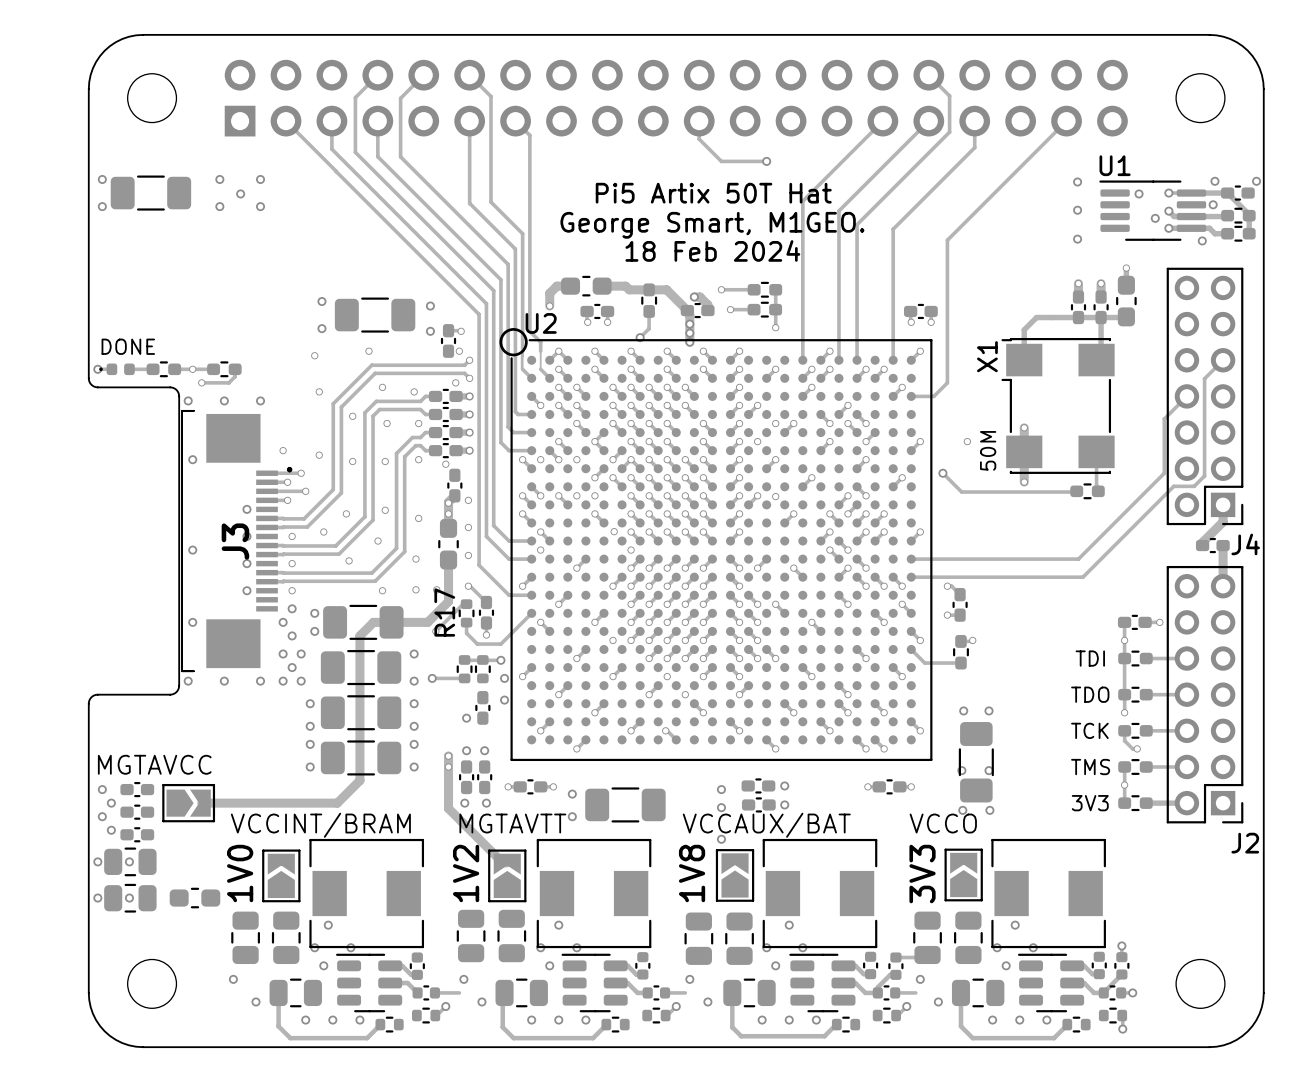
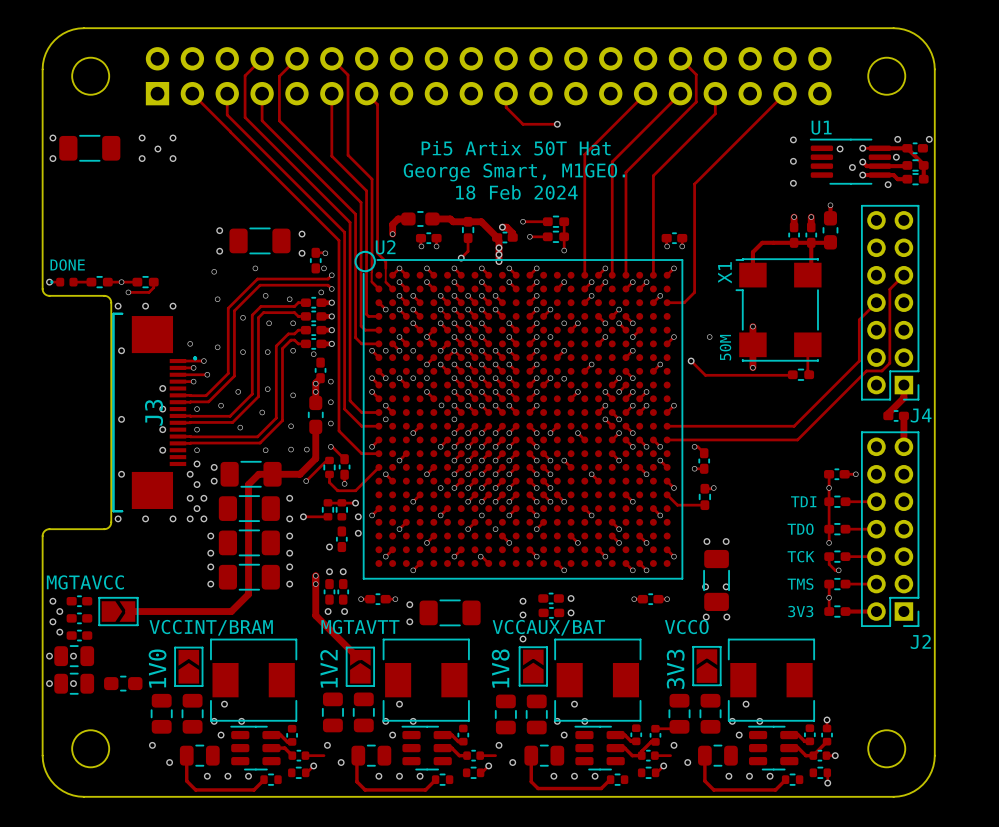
R17 name: R17 (444, 612) -> none

